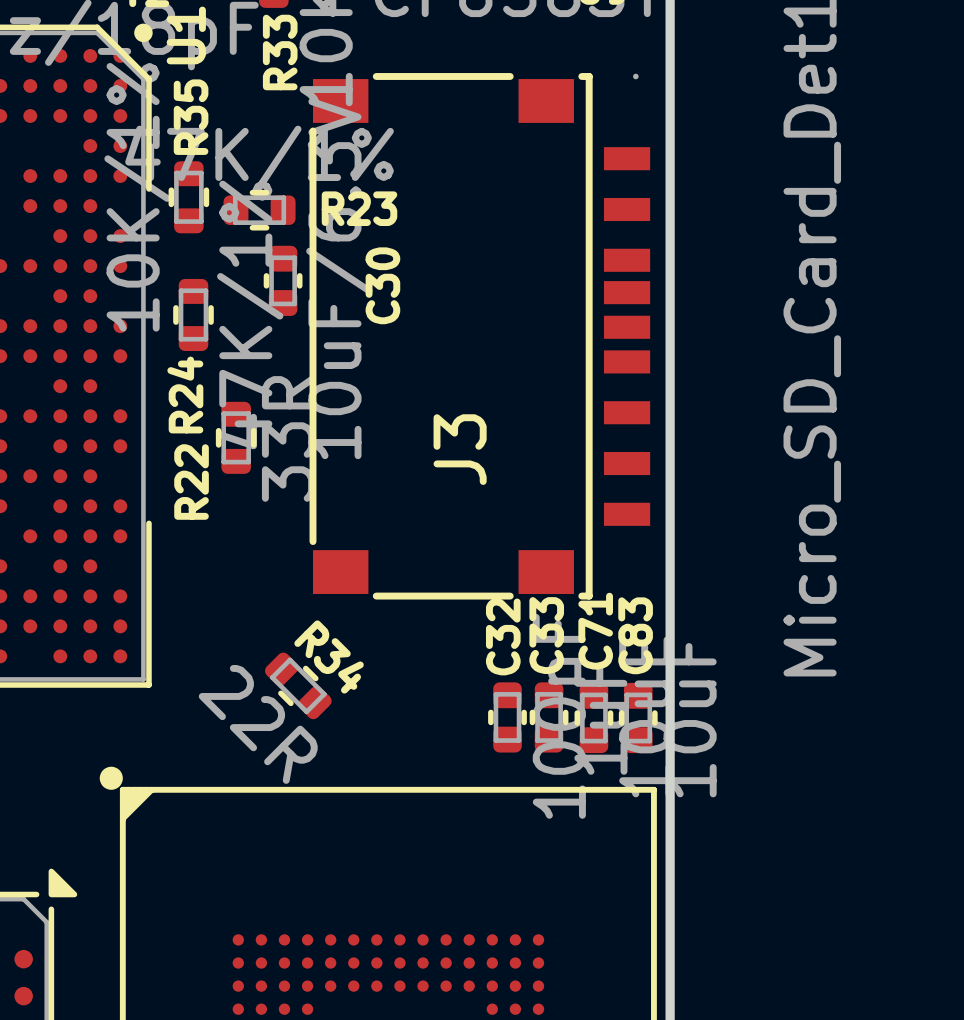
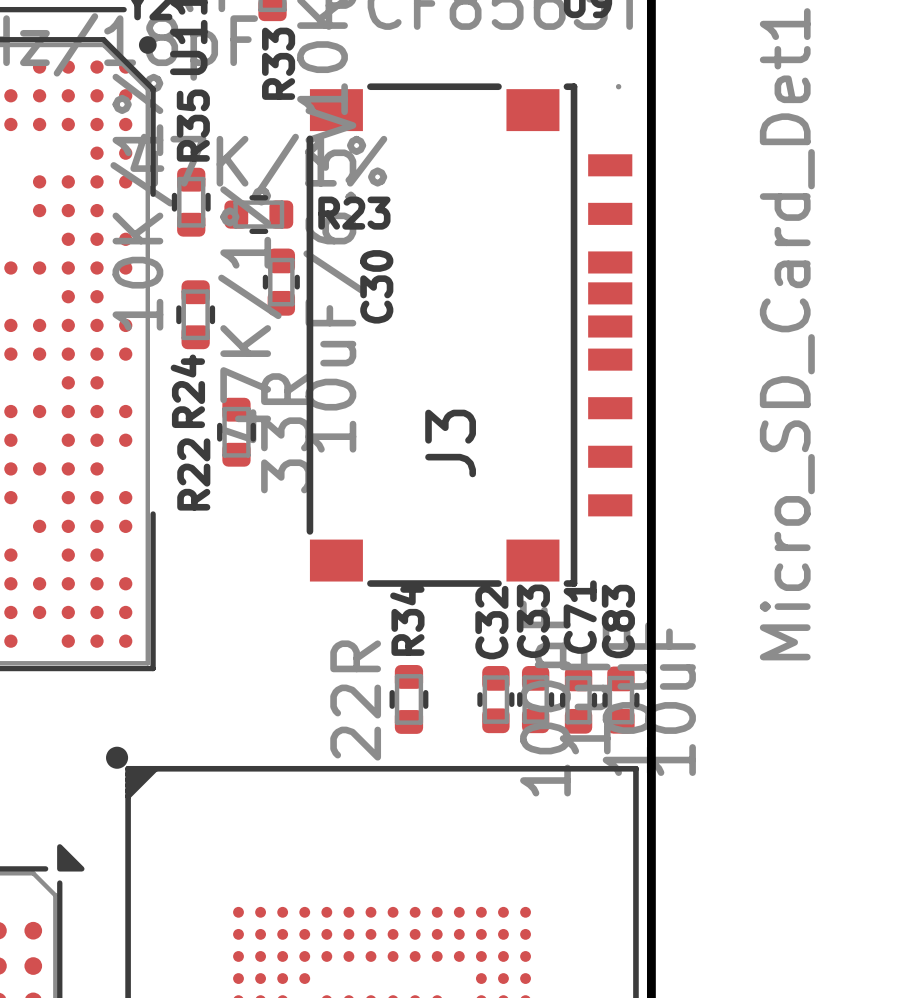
R34 rotation: 0° (298, 685) -> 45° clockwise (408, 699)
R34 position: (298, 685) -> (408, 699)

